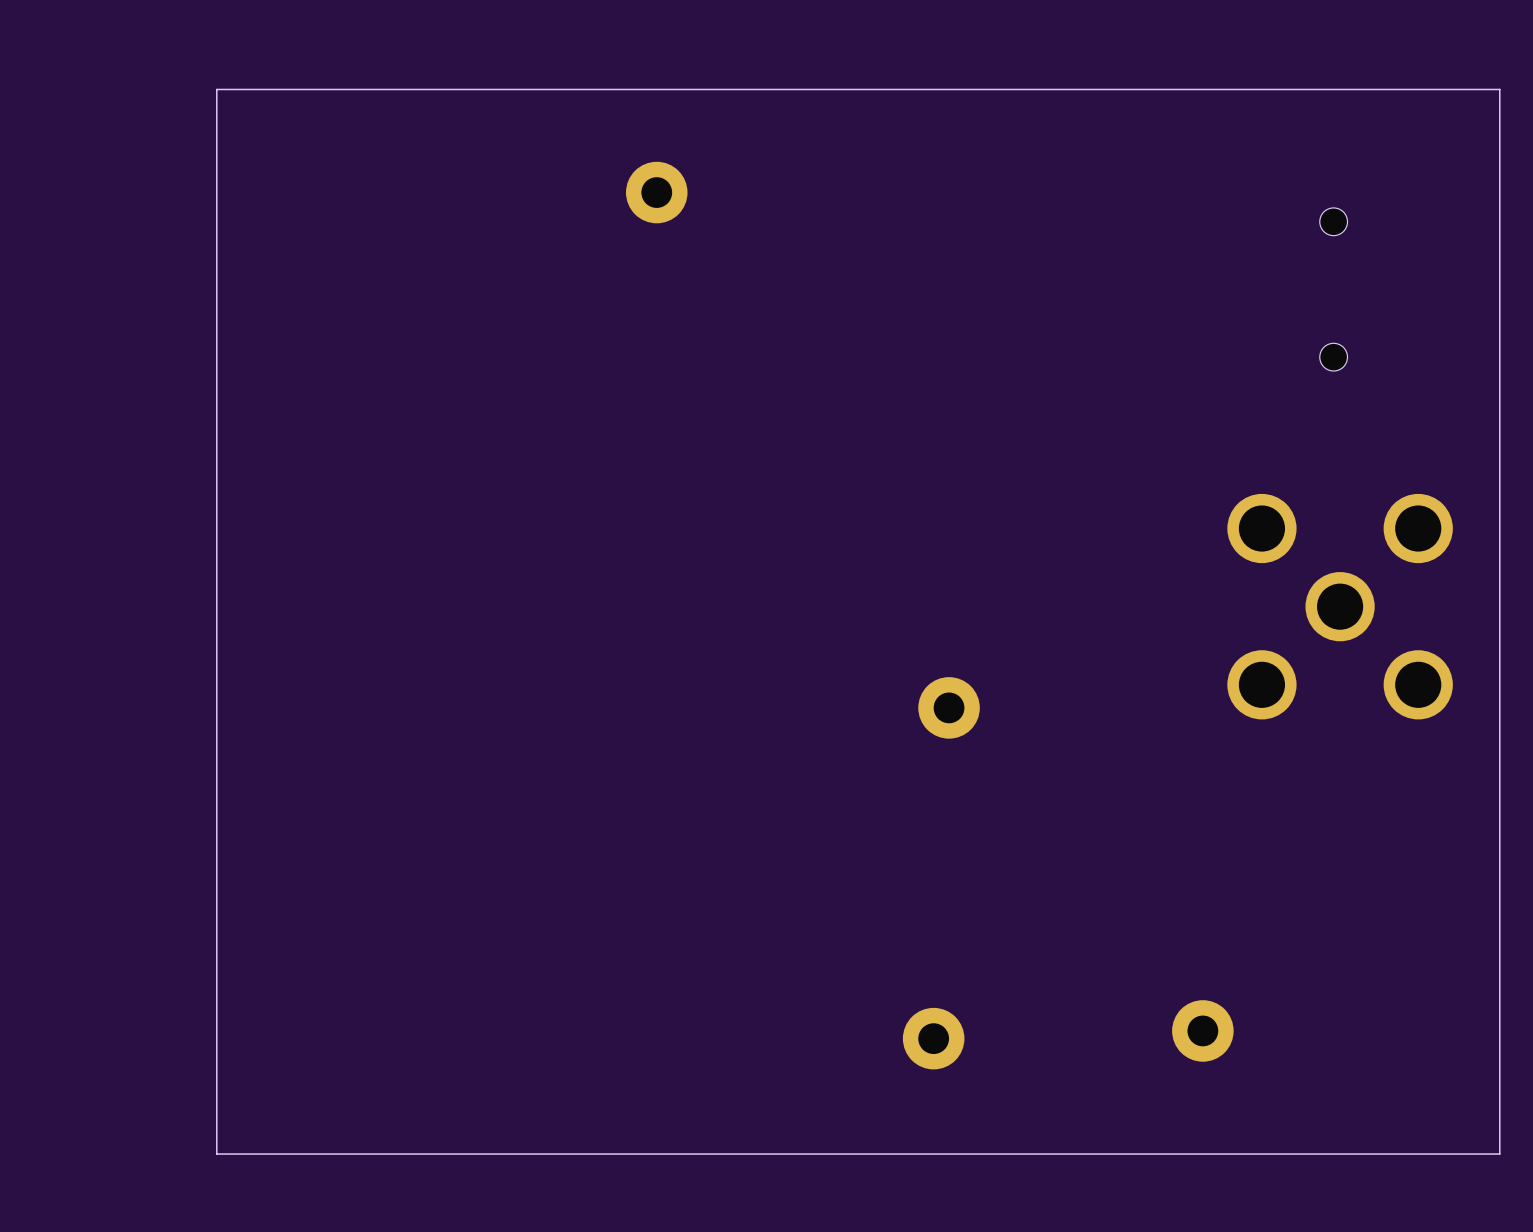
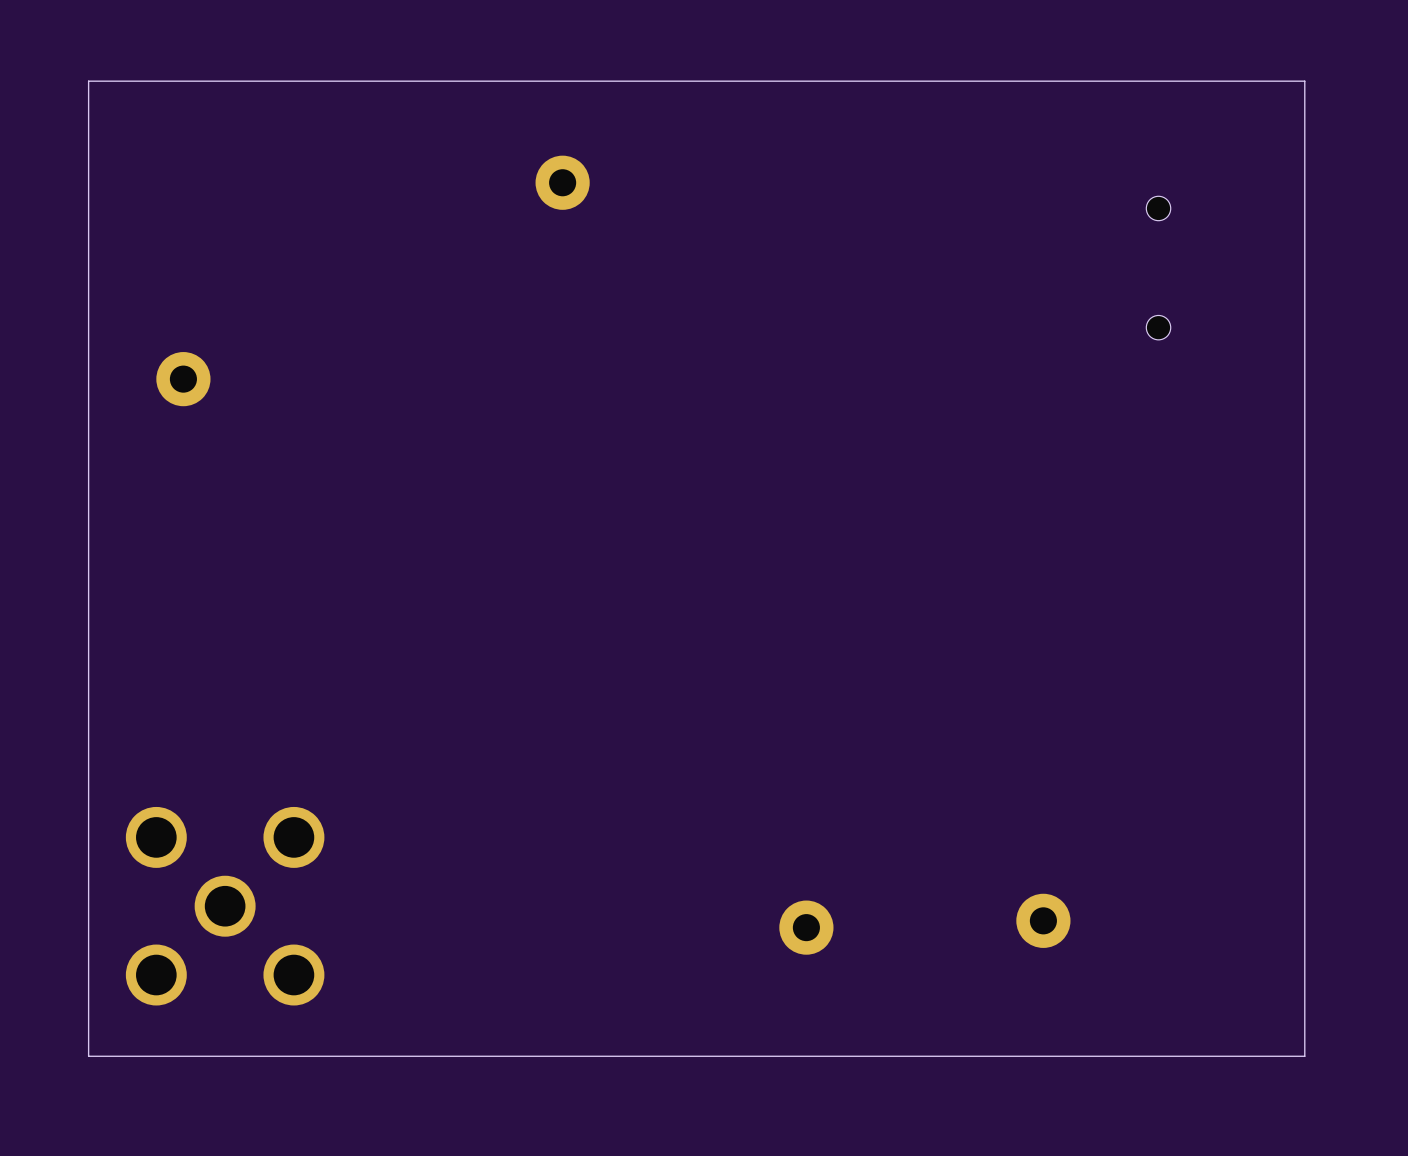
board edge: (1499, 89) (216, 89) (216, 1154) (1499, 1154) -> (1304, 92) (1304, 81) (88, 81) (88, 1056) (1304, 1056) (1304, 1029)
part: none -> (183, 379)
part: (1340, 606) -> none
part: (949, 707) -> none
part: none -> (225, 906)

